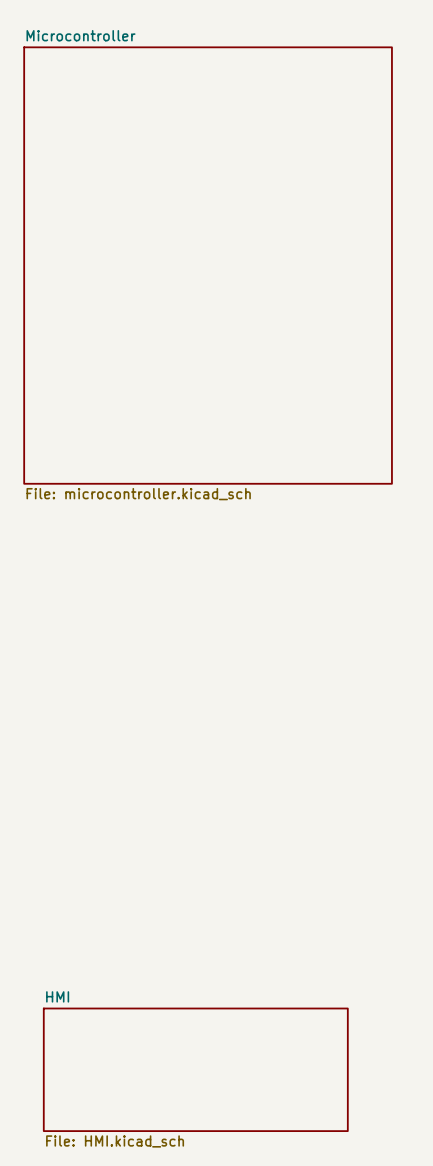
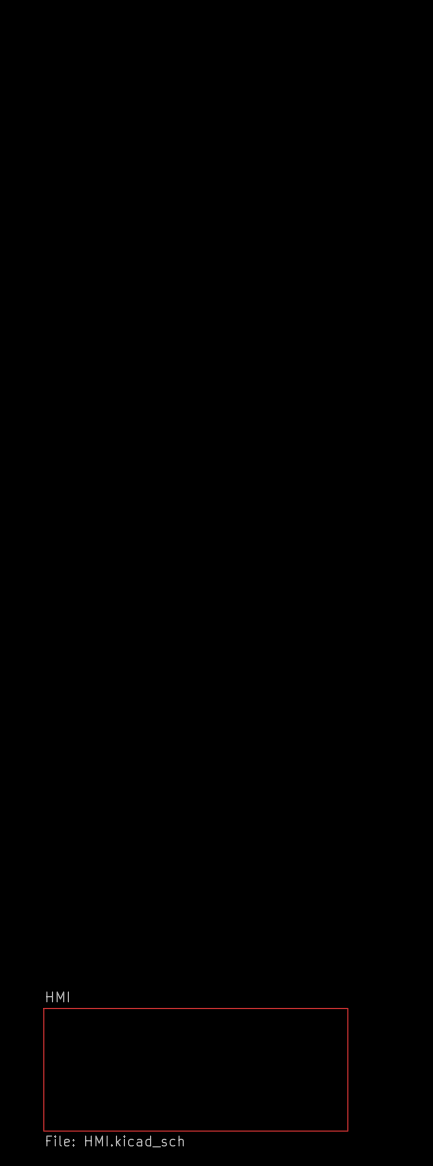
sheet Microcontroller: File: microcontroller.kicad_sch (208, 265) -> none

